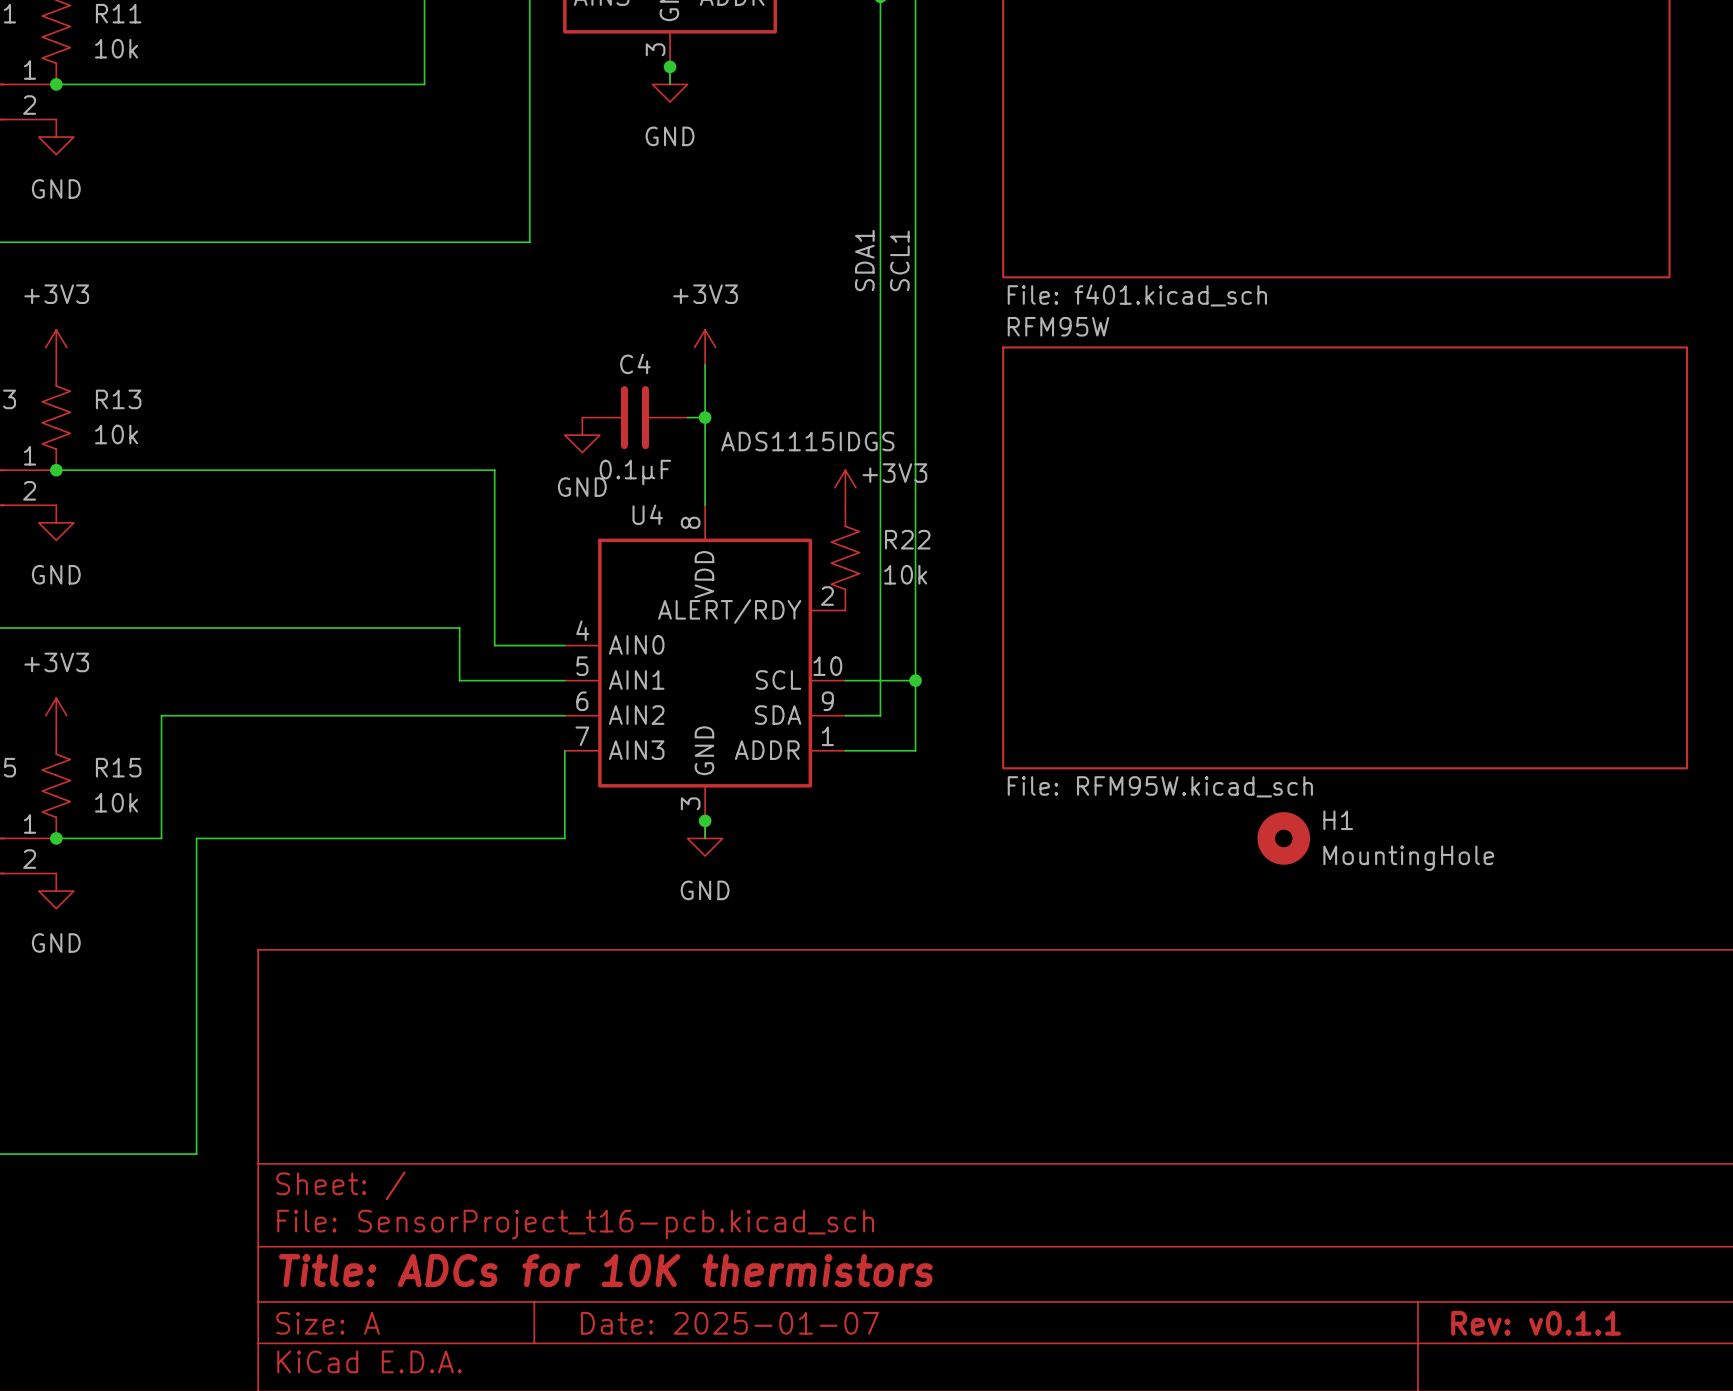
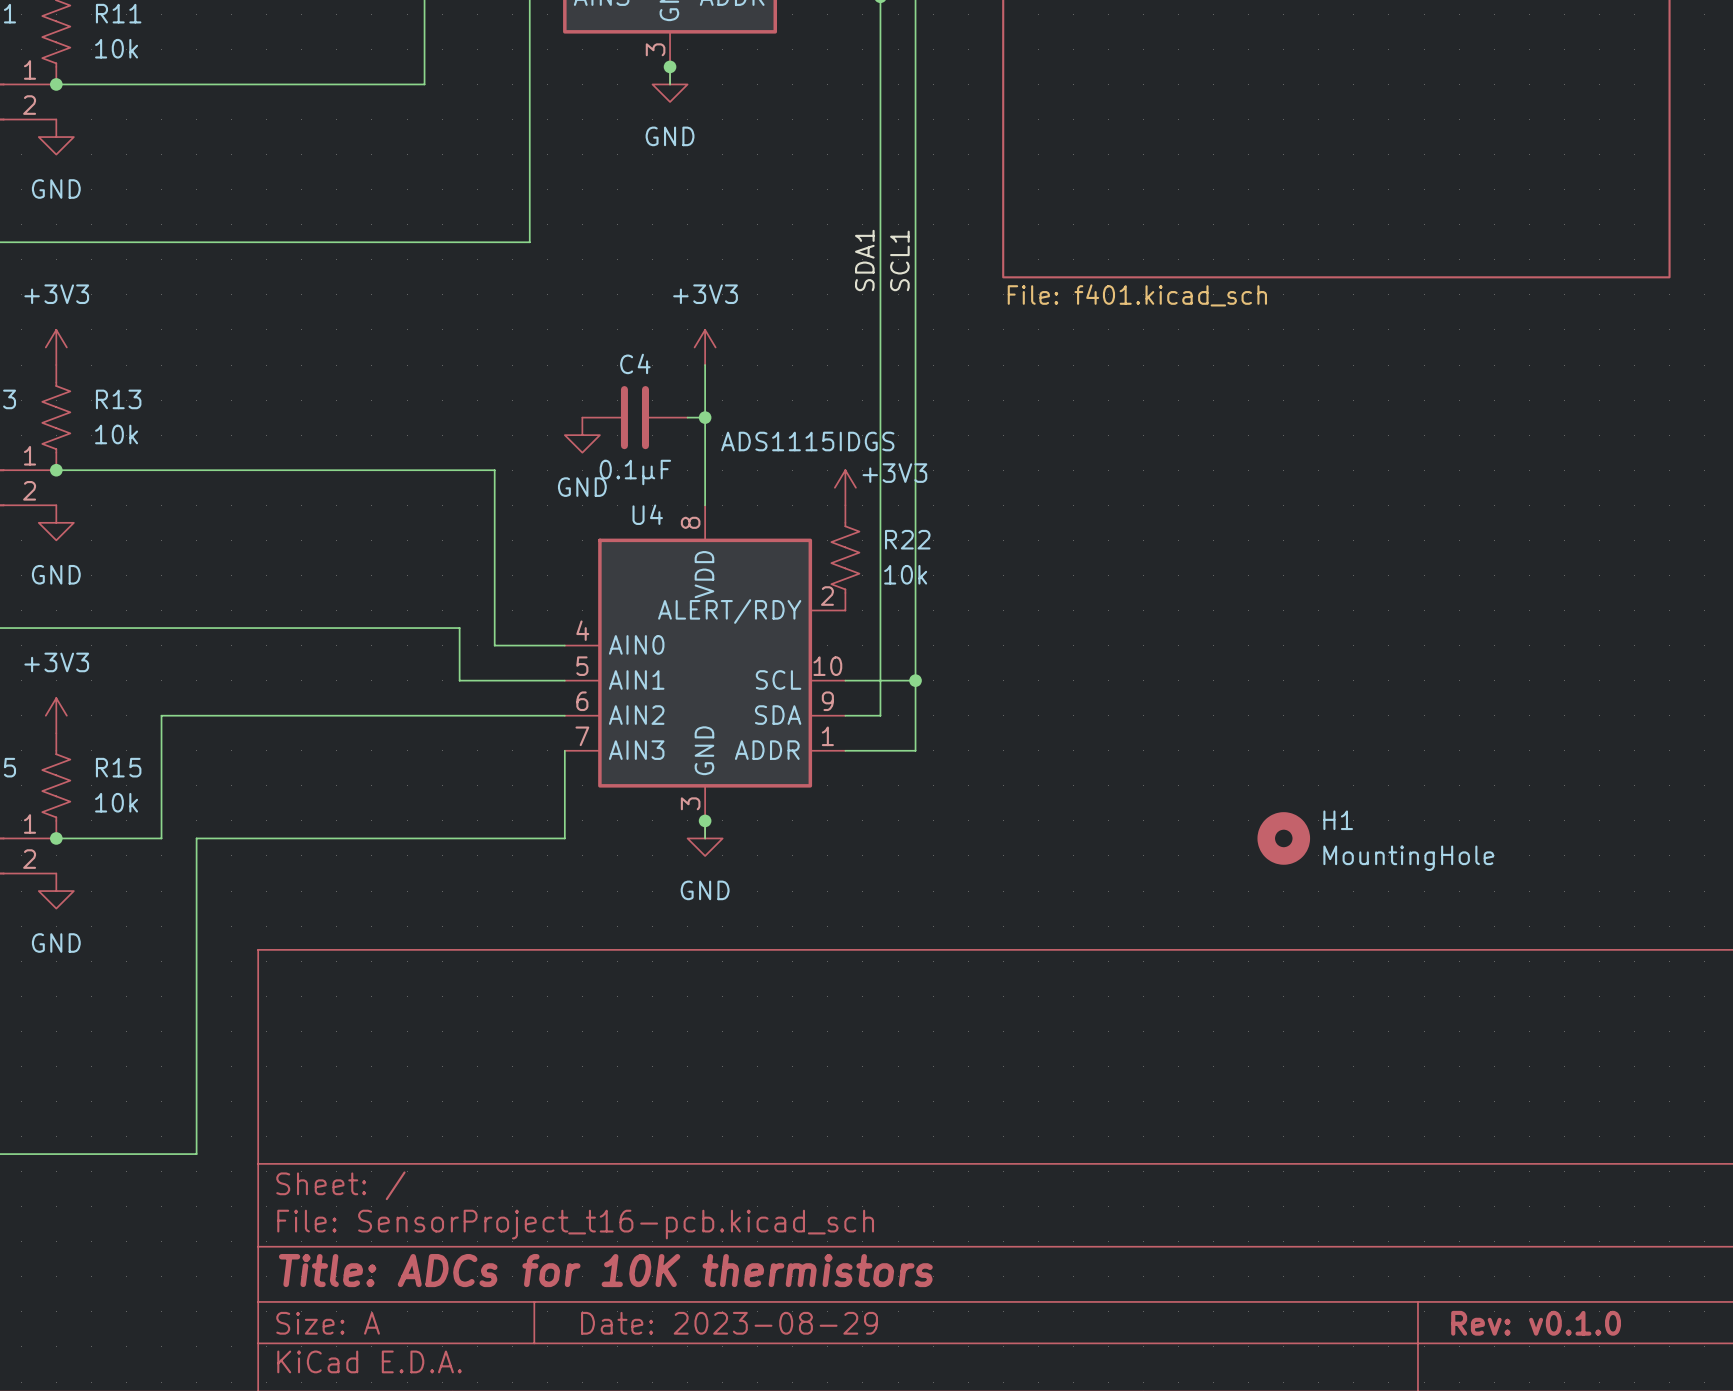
sheet RFM95W: File: RFM95W.kicad_sch (1345, 557) -> none
title block: Date: 2025-01-07 (729, 1323) -> Date: 2023-08-29 (729, 1323)
title block: Rev: v0.1.1 (1536, 1323) -> Rev: v0.1.0 (1536, 1323)

